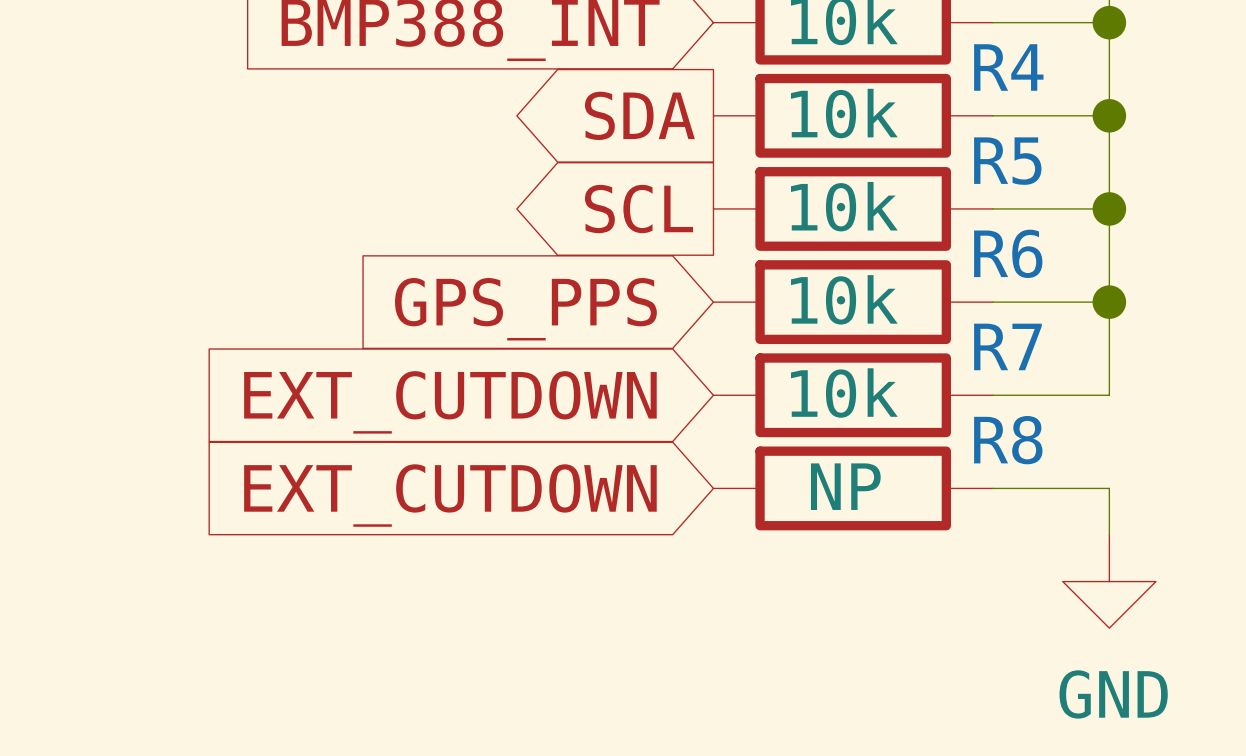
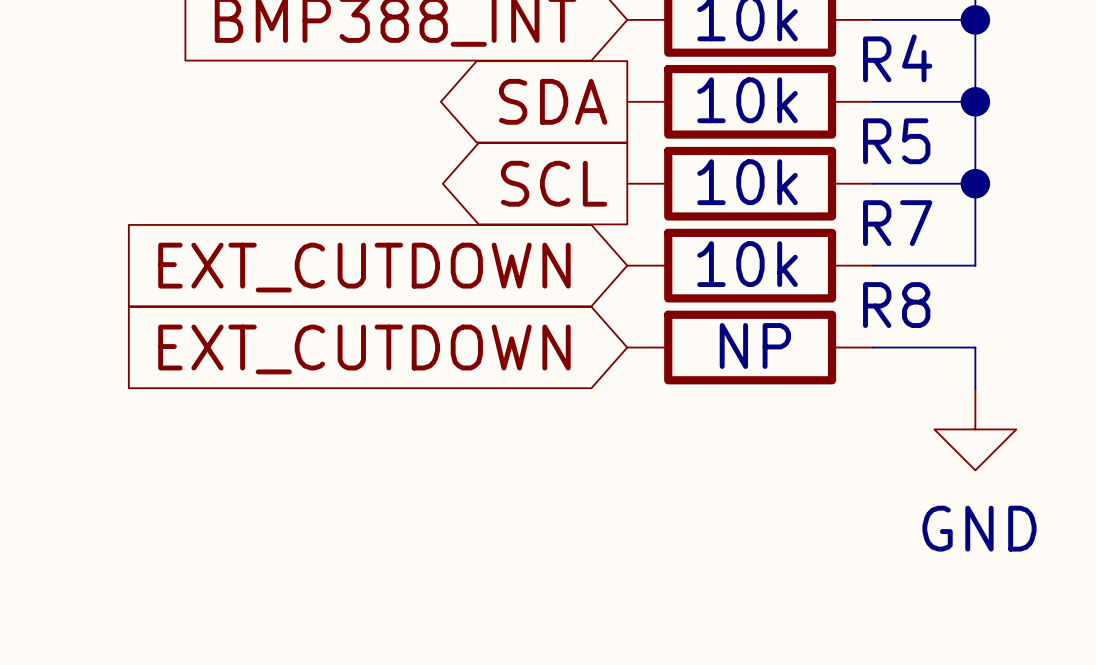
R6 name: R6 (1008, 253) -> R7 (897, 223)
wire: (1109, 302) (1109, 395) -> (975, 388) (975, 347)
junction: (1109, 302) -> none
global label: GPS_PPS (525, 309) -> EXT_CUTDOWN (364, 267)
R7 name: R7 (1007, 346) -> R8 (896, 305)
R7 value: 10k (844, 393) -> NP (755, 346)
R8: NP (853, 488) -> none
wire: (992, 488) (1109, 488) (1109, 535) -> none
global label: EXT_CUTDOWN (450, 495) -> none
power symbol position: GND (1109, 581) -> GND (975, 429)

